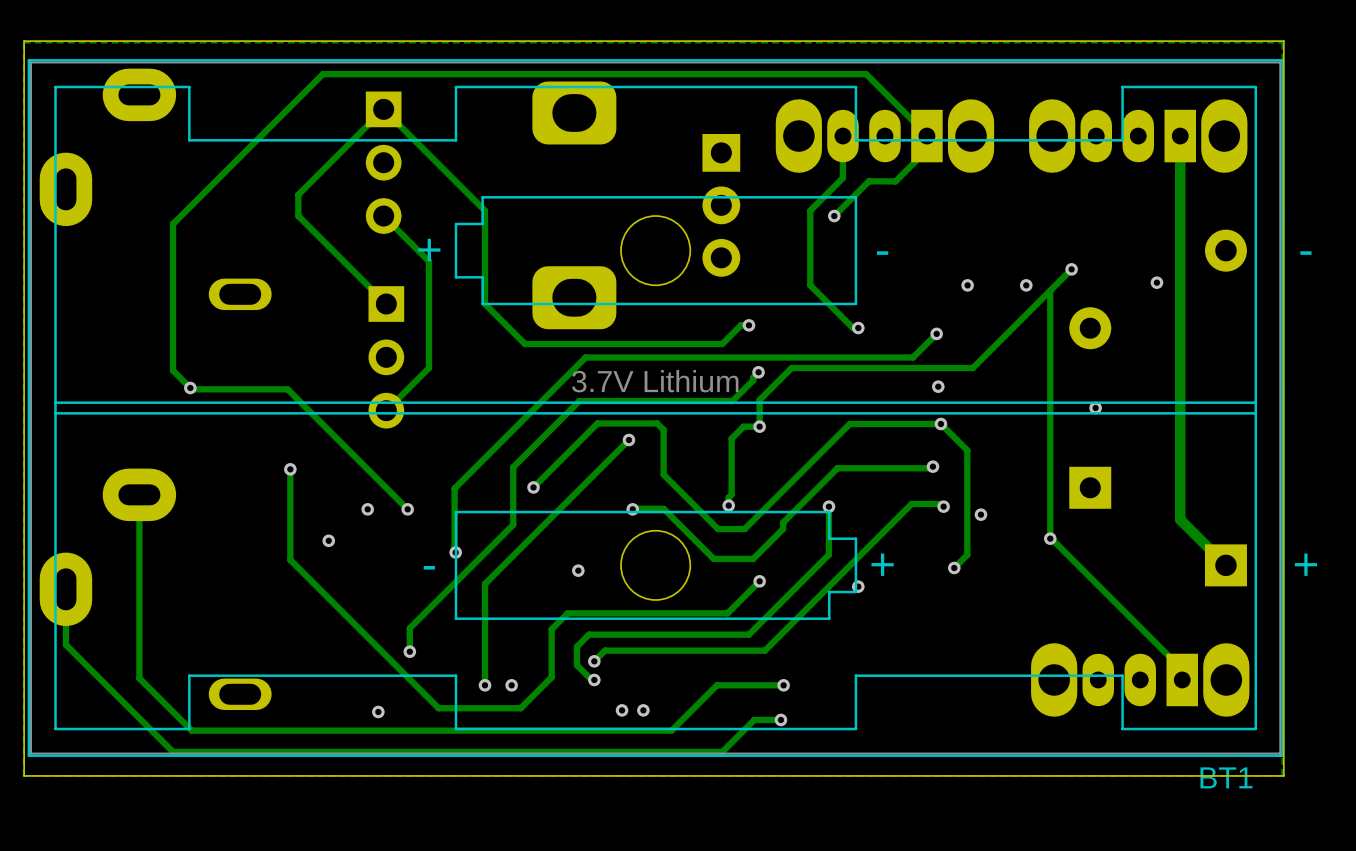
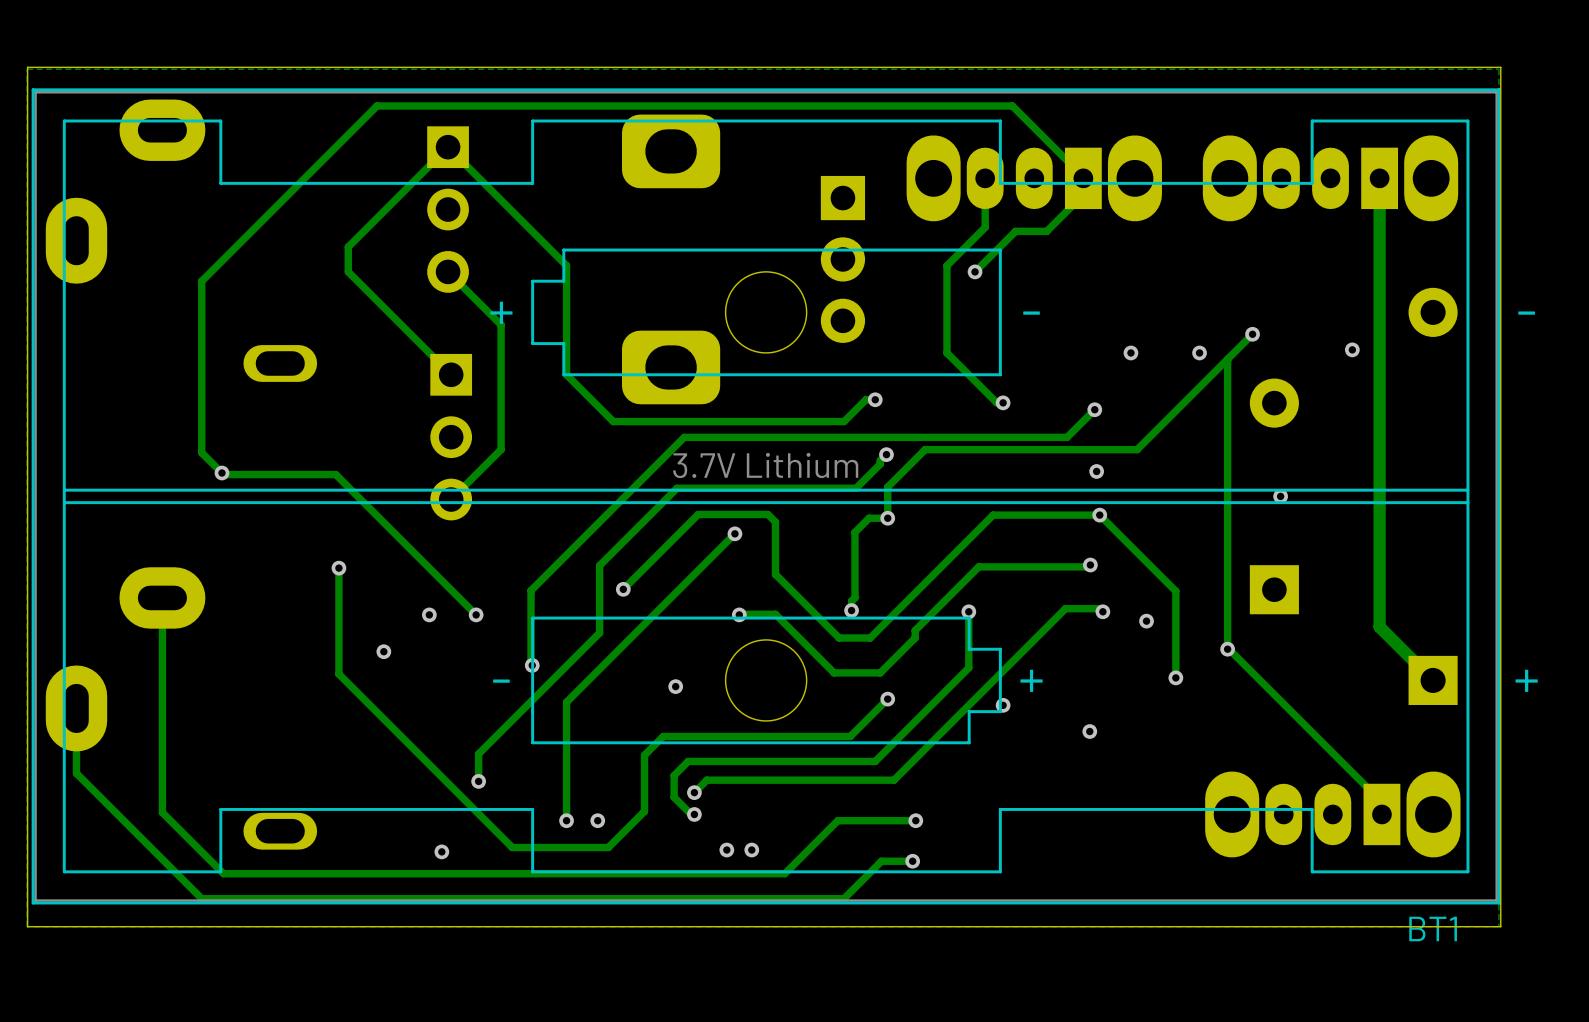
track: (967, 450) (967, 554) (954, 567) -> (1130, 545) (1175, 591) (1175, 677)
via: none -> (1175, 677)
via: (954, 567) -> none
via: none -> (1089, 731)

